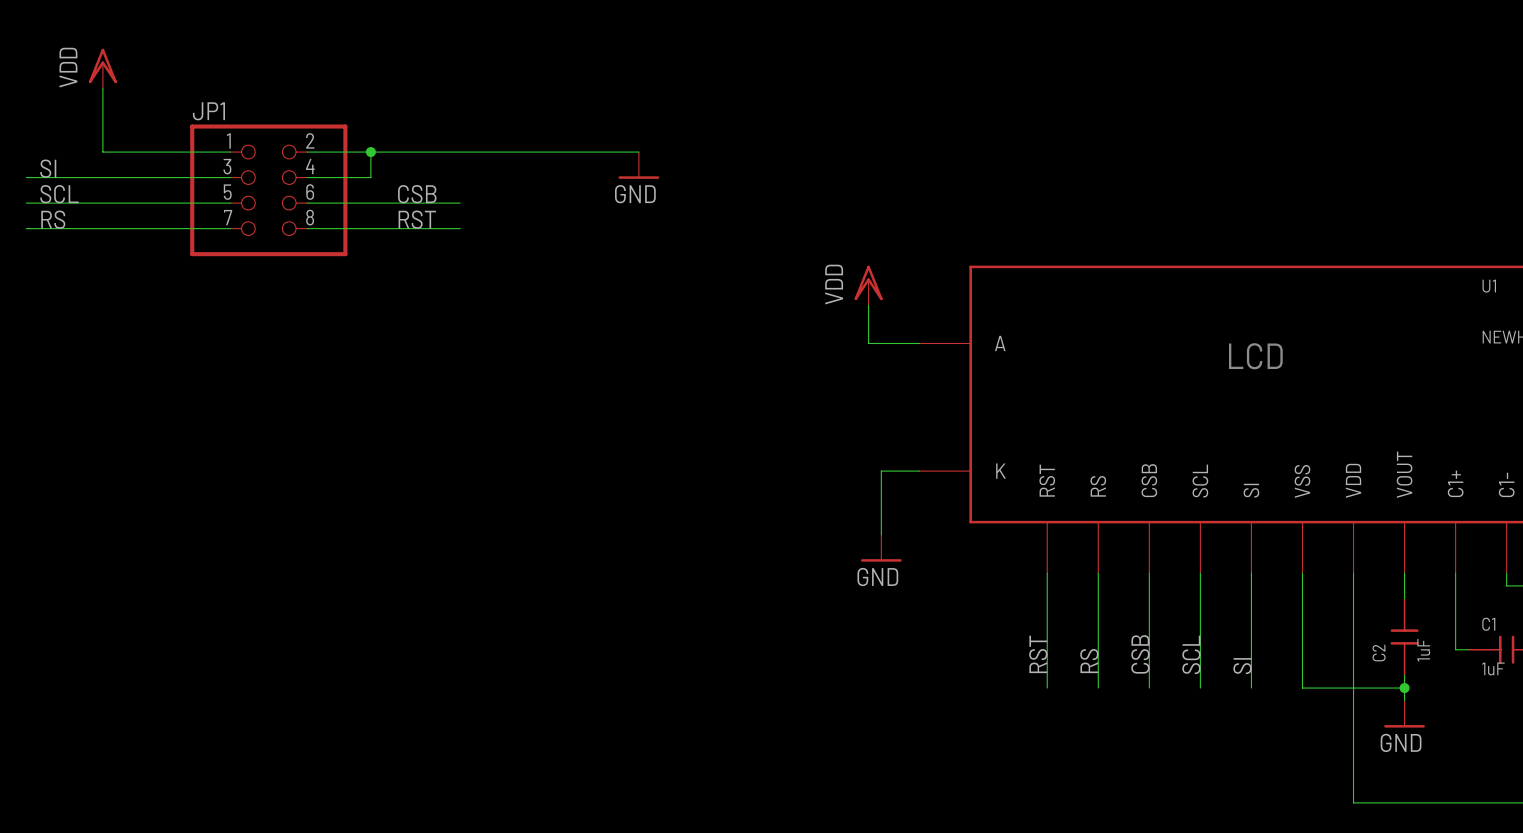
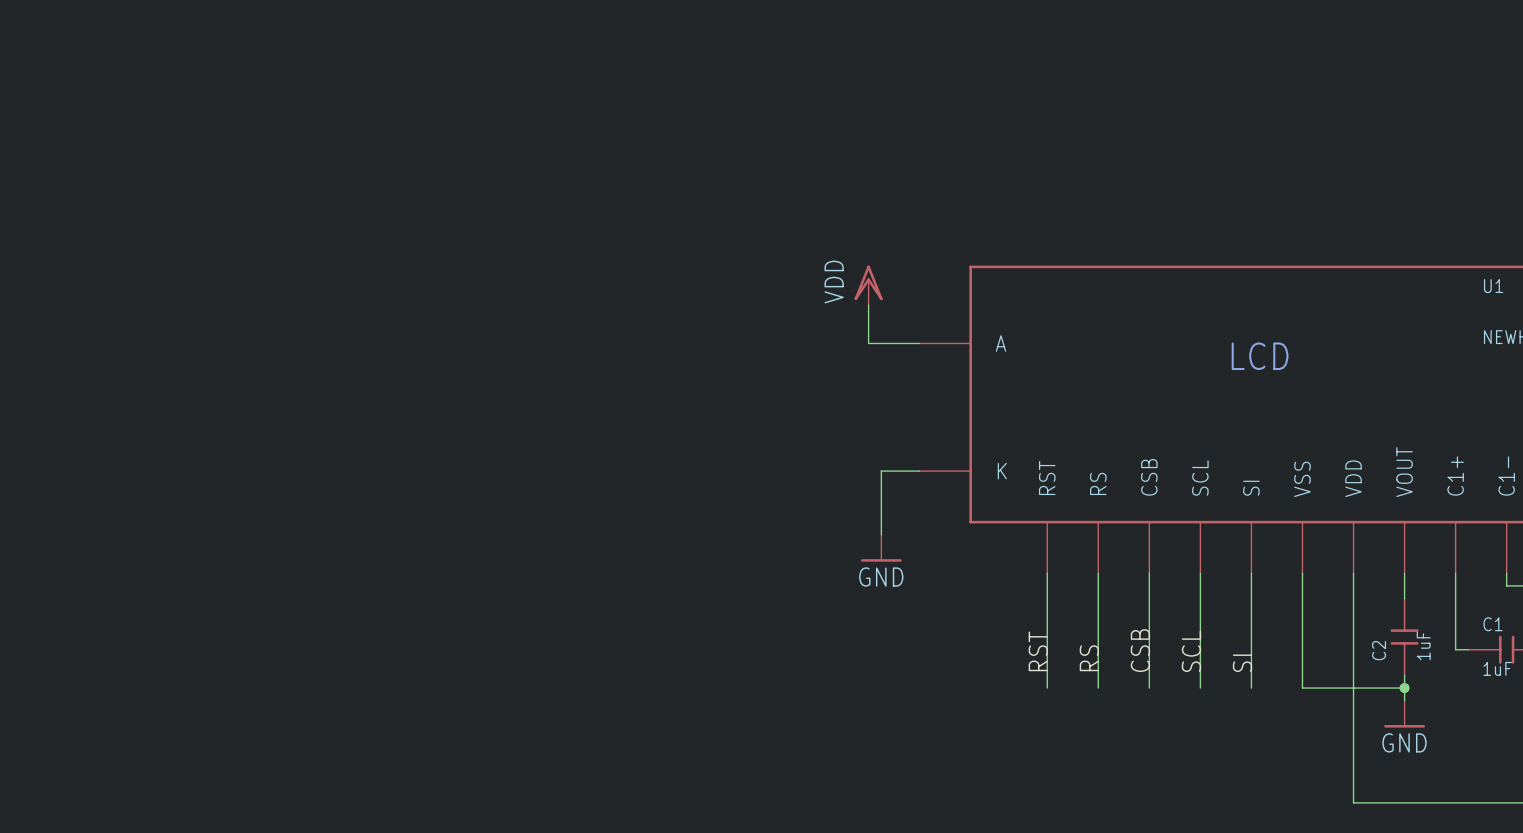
power symbol: VDD (102, 68) -> none
wire: (102, 88) (102, 152) (230, 152) -> none
wire: (307, 152) (638, 152) -> none
wire: (370, 152) (370, 177) (307, 177) -> none
junction: (370, 152) -> none
power symbol: GND (638, 165) -> none
label: SI (48, 168) -> none
wire: (26, 177) (230, 177) -> none
JP1: (268, 190) -> none
label: SCL (59, 194) -> none
label: CSB (417, 194) -> none
wire: (26, 203) (230, 203) -> none
wire: (307, 203) (460, 203) -> none
label: RS (53, 219) -> none
label: RST (417, 219) -> none
wire: (26, 228) (230, 228) -> none
wire: (307, 228) (460, 228) -> none

